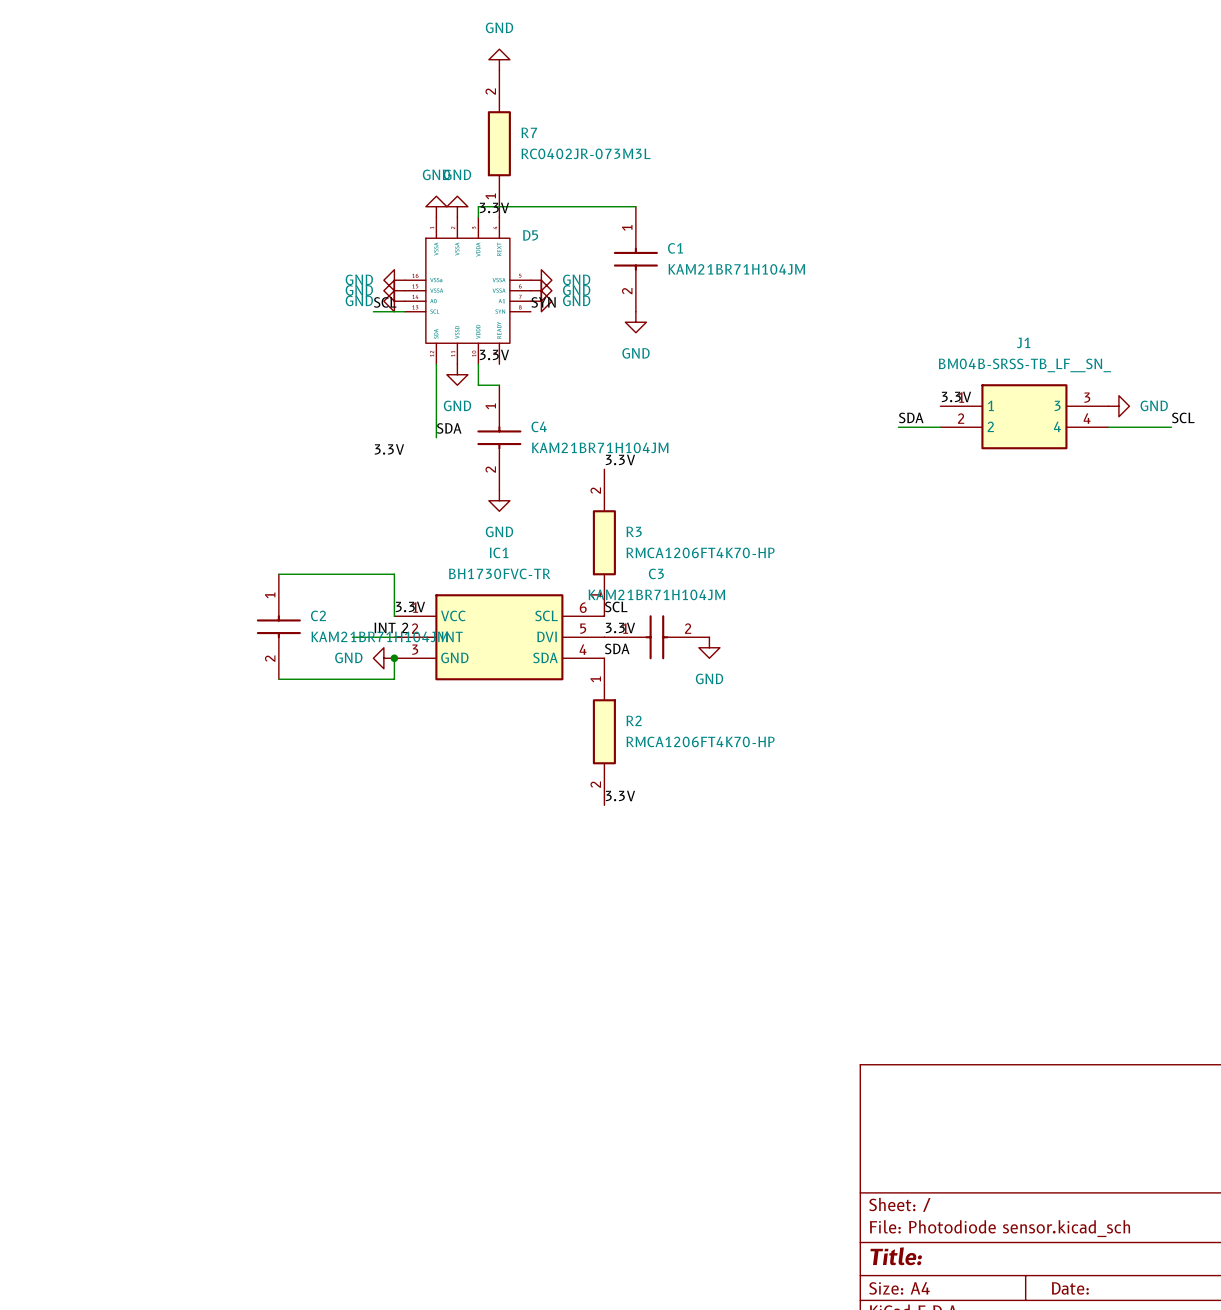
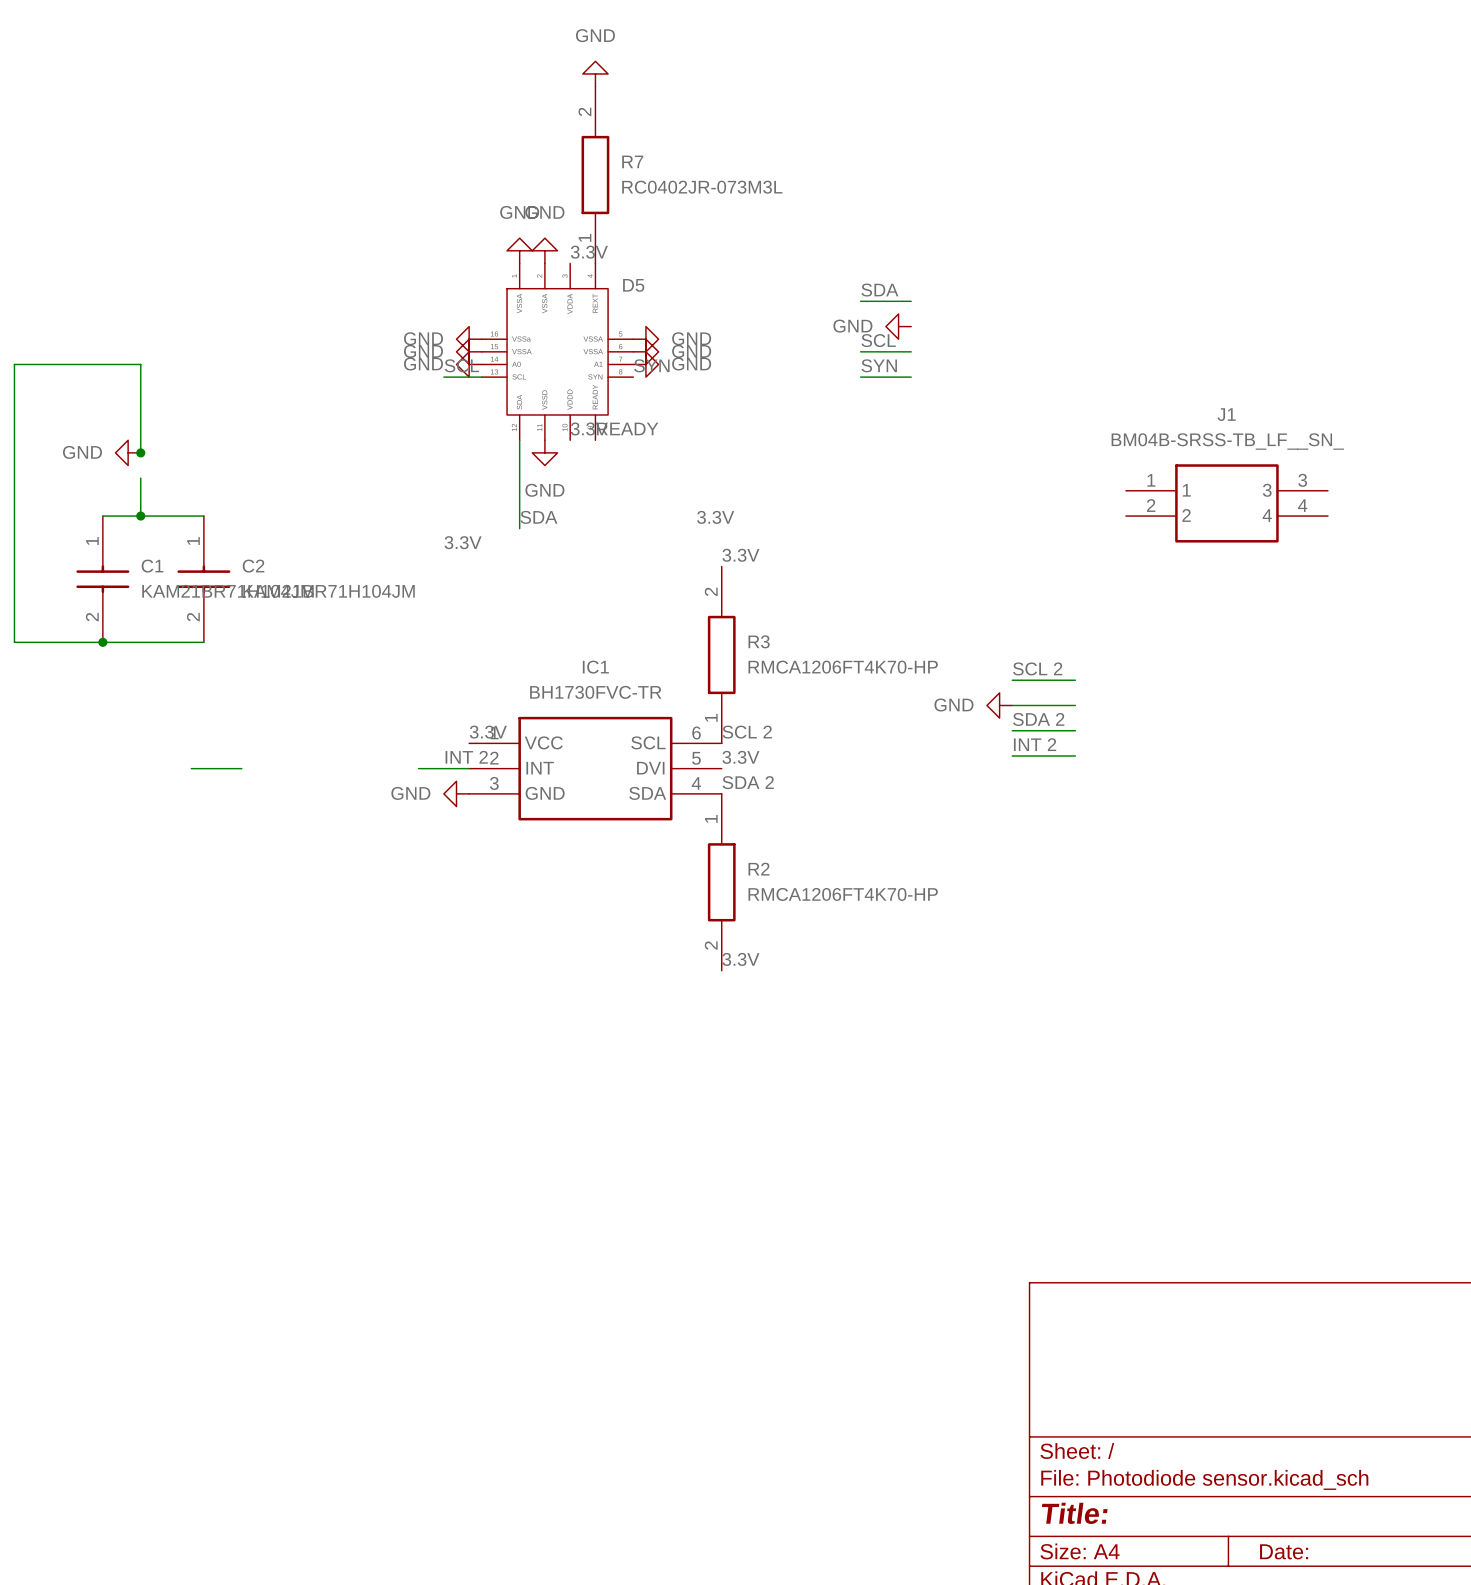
wire: (635, 206) (478, 206) (478, 217) -> none
label: none -> SDA (879, 290)
wire: none -> (860, 301) (911, 301)
C1 position: (635, 259) -> (102, 579)
label: none -> SCL (878, 340)
wire: none -> (860, 351) (911, 351)
label: none -> SYN (879, 365)
wire: none -> (860, 377) (911, 377)
power symbol rotation: 0° (635, 322) -> 90° clockwise (898, 326)
power symbol position: GND (635, 322) -> GND (898, 326)
label: none -> READY (627, 428)
wire: (478, 364) (478, 385) (499, 385) -> none
power symbol: none -> GND (128, 452)
wire: none -> (140, 452) (140, 364) (14, 364) (14, 642) (203, 642)
junction: none -> (140, 452)
wire: none -> (140, 478) (140, 516)
label: 3.3V (956, 396) -> none
power symbol: GND (1118, 406) -> none
label: SDA (911, 417) -> none
label: SCL (1183, 417) -> none
wire: none -> (102, 516) (203, 516)
junction: none -> (140, 516)
wire: (898, 427) (940, 427) -> none
wire: (1108, 427) (1171, 427) -> none
label: none -> 3.3V (715, 517)
C4: KAM21BR71H104JM (499, 437) -> none
power symbol: GND (499, 500) -> none
junction: none -> (102, 642)
label: none -> SCL 2 (1037, 668)
wire: none -> (1012, 680) (1075, 680)
wire: (278, 574) (394, 574) (394, 616) -> none
wire: none -> (1012, 705) (1075, 705)
label: none -> SDA 2 (1038, 719)
wire: none -> (1012, 730) (1075, 730)
label: SCL (616, 606) -> SCL 2 (747, 732)
label: none -> INT 2 (1035, 744)
C2 position: (278, 626) -> (203, 579)
wire: none -> (1012, 756) (1075, 756)
wire: none -> (191, 768) (241, 768)
C3: KAM21BR71H104JM (656, 637) -> none
power symbol rotation: 0° (709, 647) -> 90° clockwise (999, 705)
power symbol position: GND (709, 647) -> GND (999, 705)
label: SDA (617, 648) -> SDA 2 (748, 782)
wire: (394, 658) (394, 679) (278, 679) -> none
junction: (394, 658) -> none

